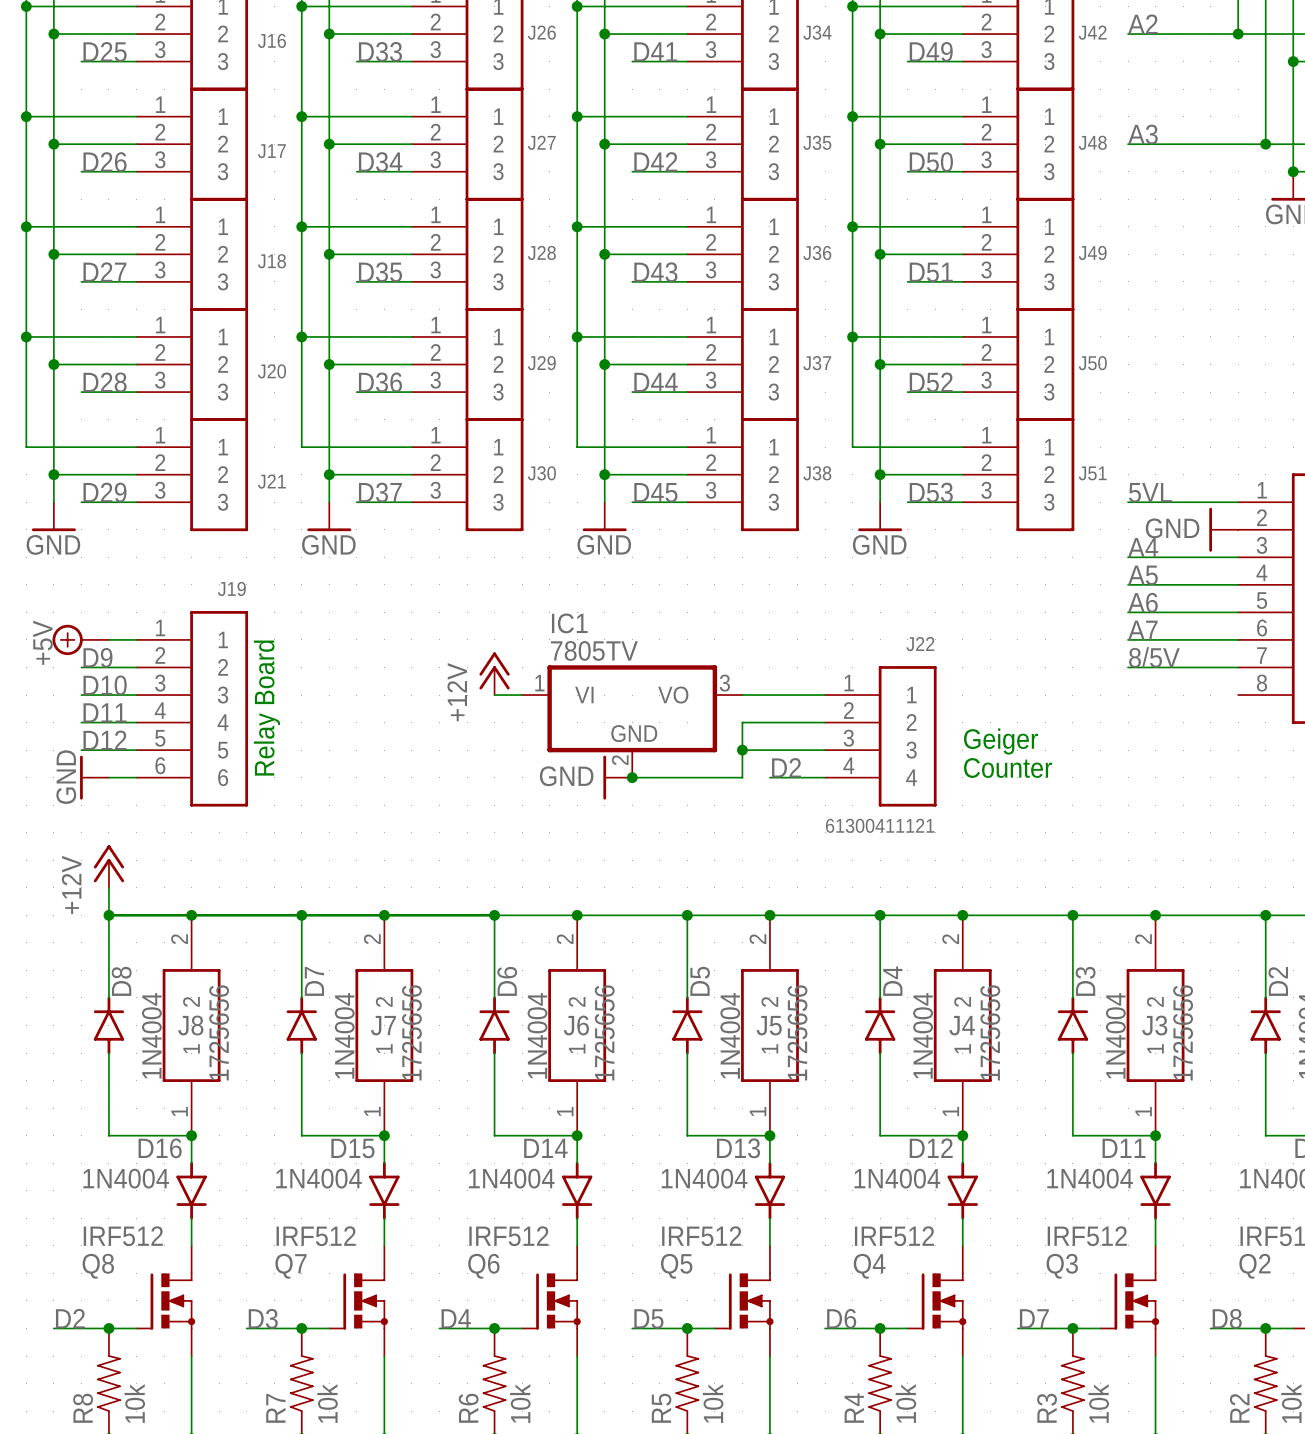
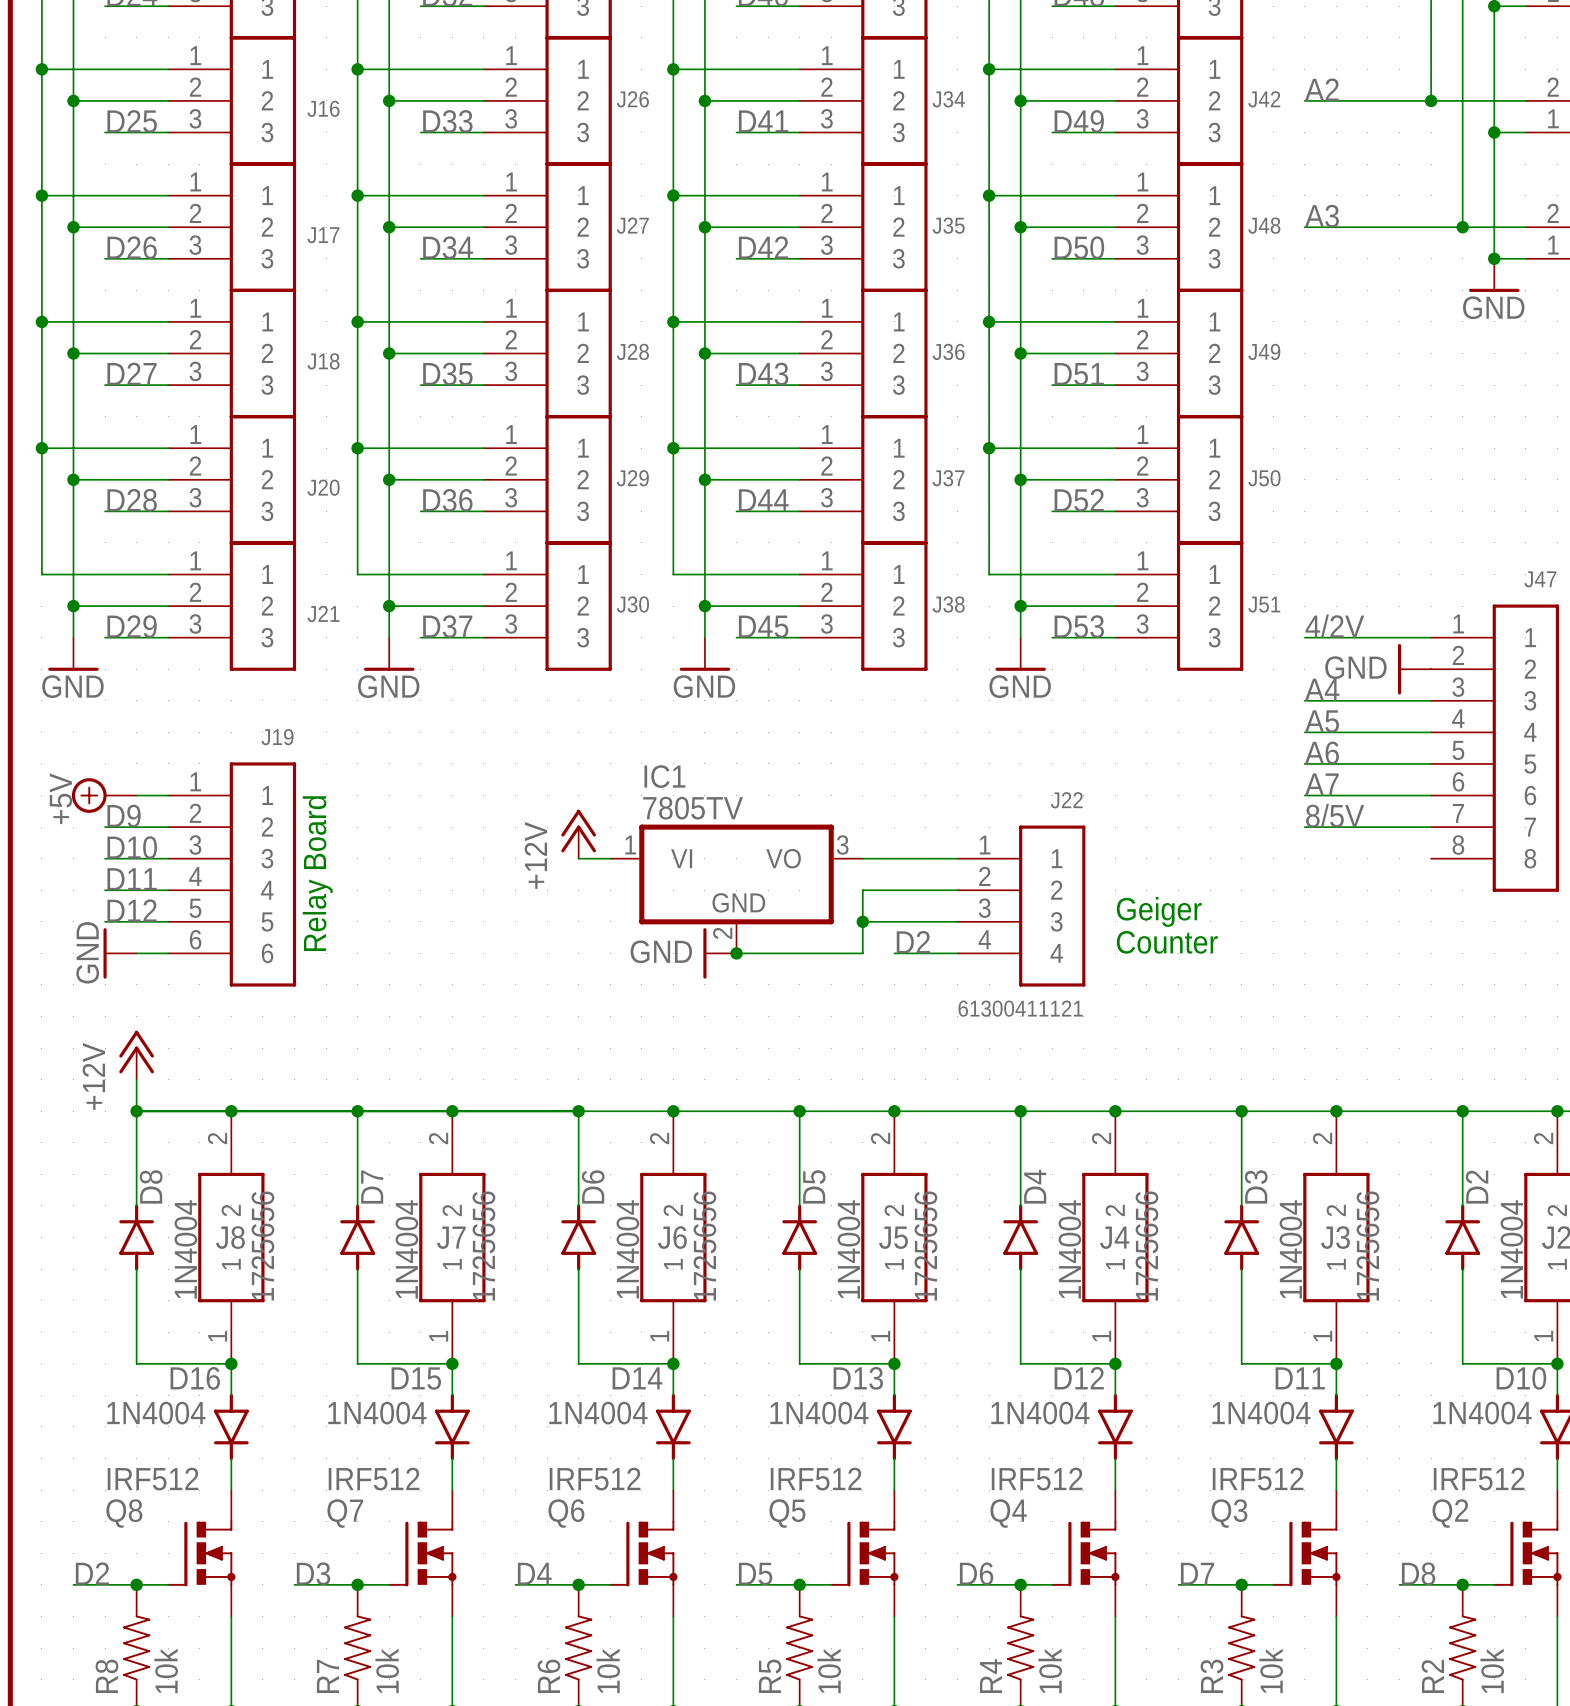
label: 5VL (1150, 492) -> 4/2V (1334, 626)

